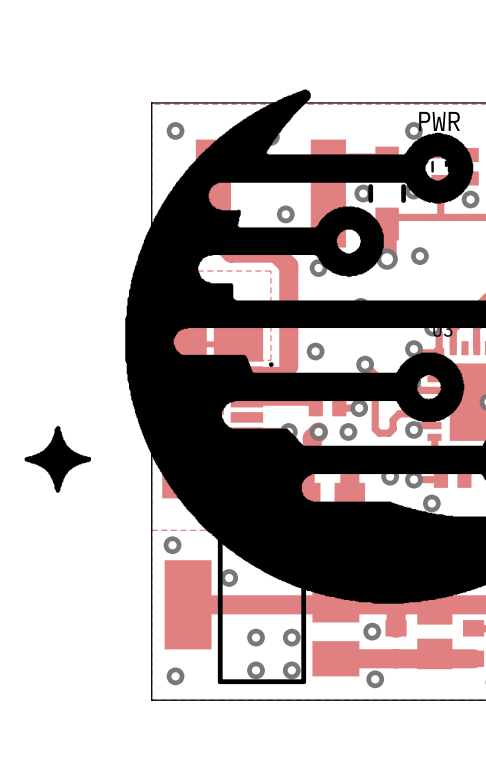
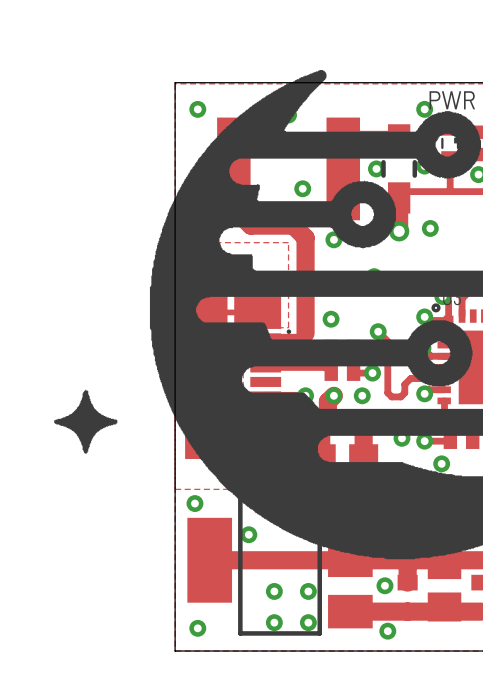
drawing: none -> [431, 303, 441, 313]

